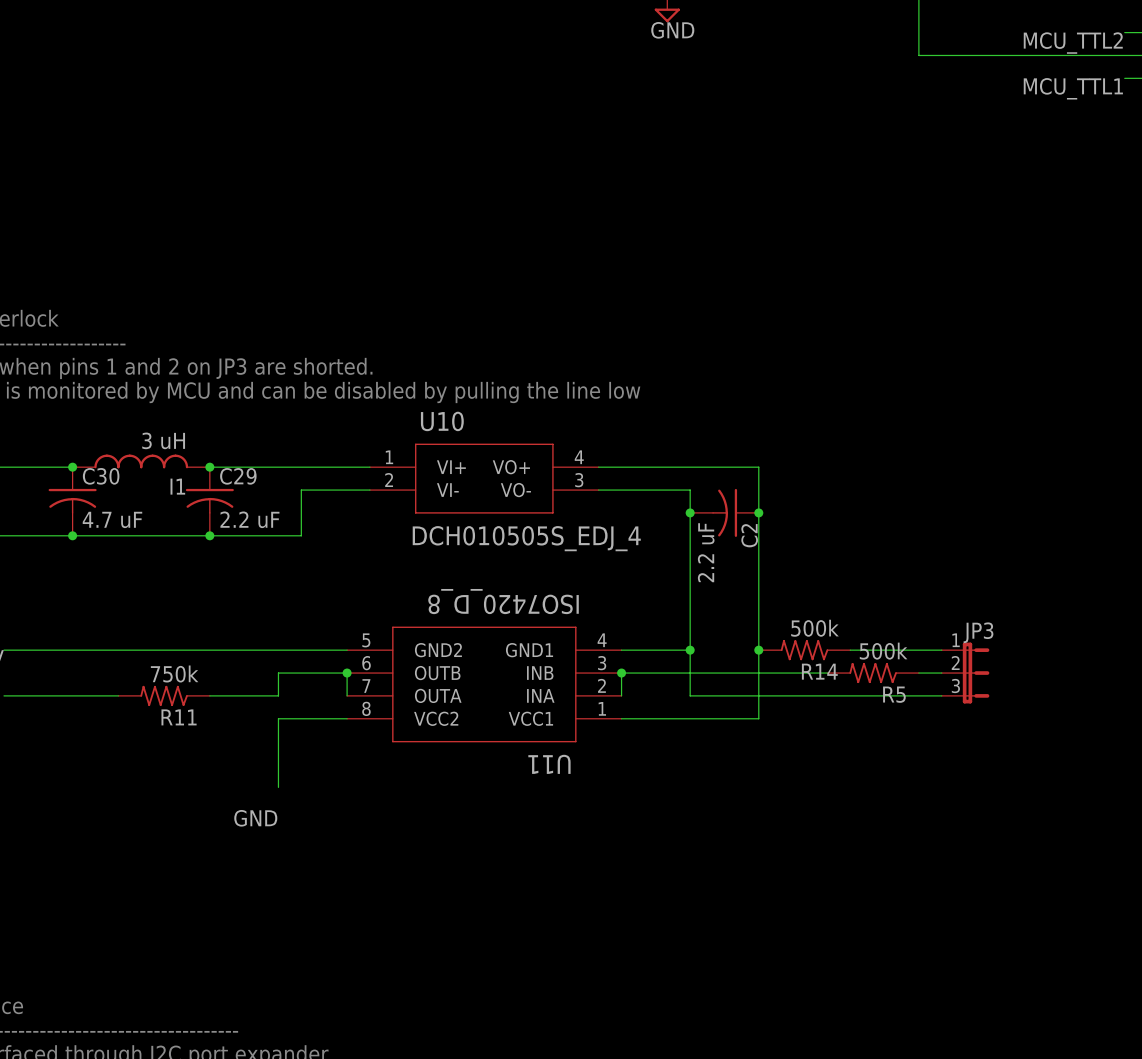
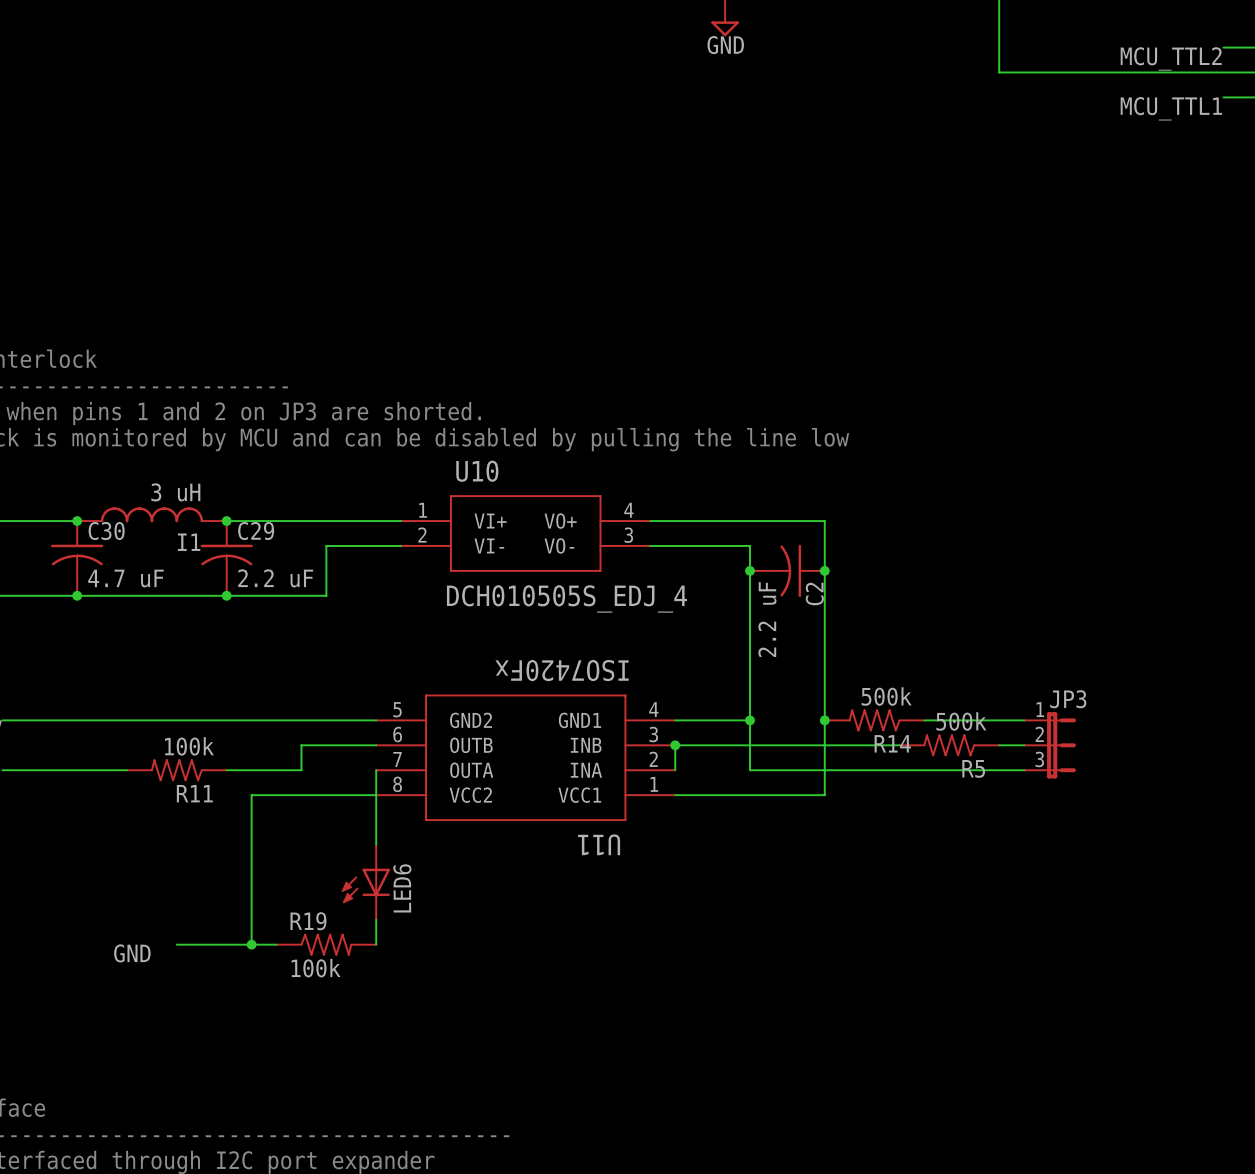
U11 value: ISO7420_D_8 (503, 601) -> ISO7420Fx (562, 670)
R11 value: 750k (174, 673) -> 100k (189, 746)
wire: (347, 673) (347, 695) -> (376, 845) (376, 770)
junction: (347, 673) -> none
wire: (278, 718) (278, 787) -> (301, 795) (251, 795) (251, 944)
LED6: none -> (365, 882)
label position: GND (255, 818) -> GND (132, 953)
wire: none -> (376, 919) (376, 944)
wire: none -> (176, 944) (276, 944)
junction: none -> (251, 944)
R19: none -> 100k (326, 944)

